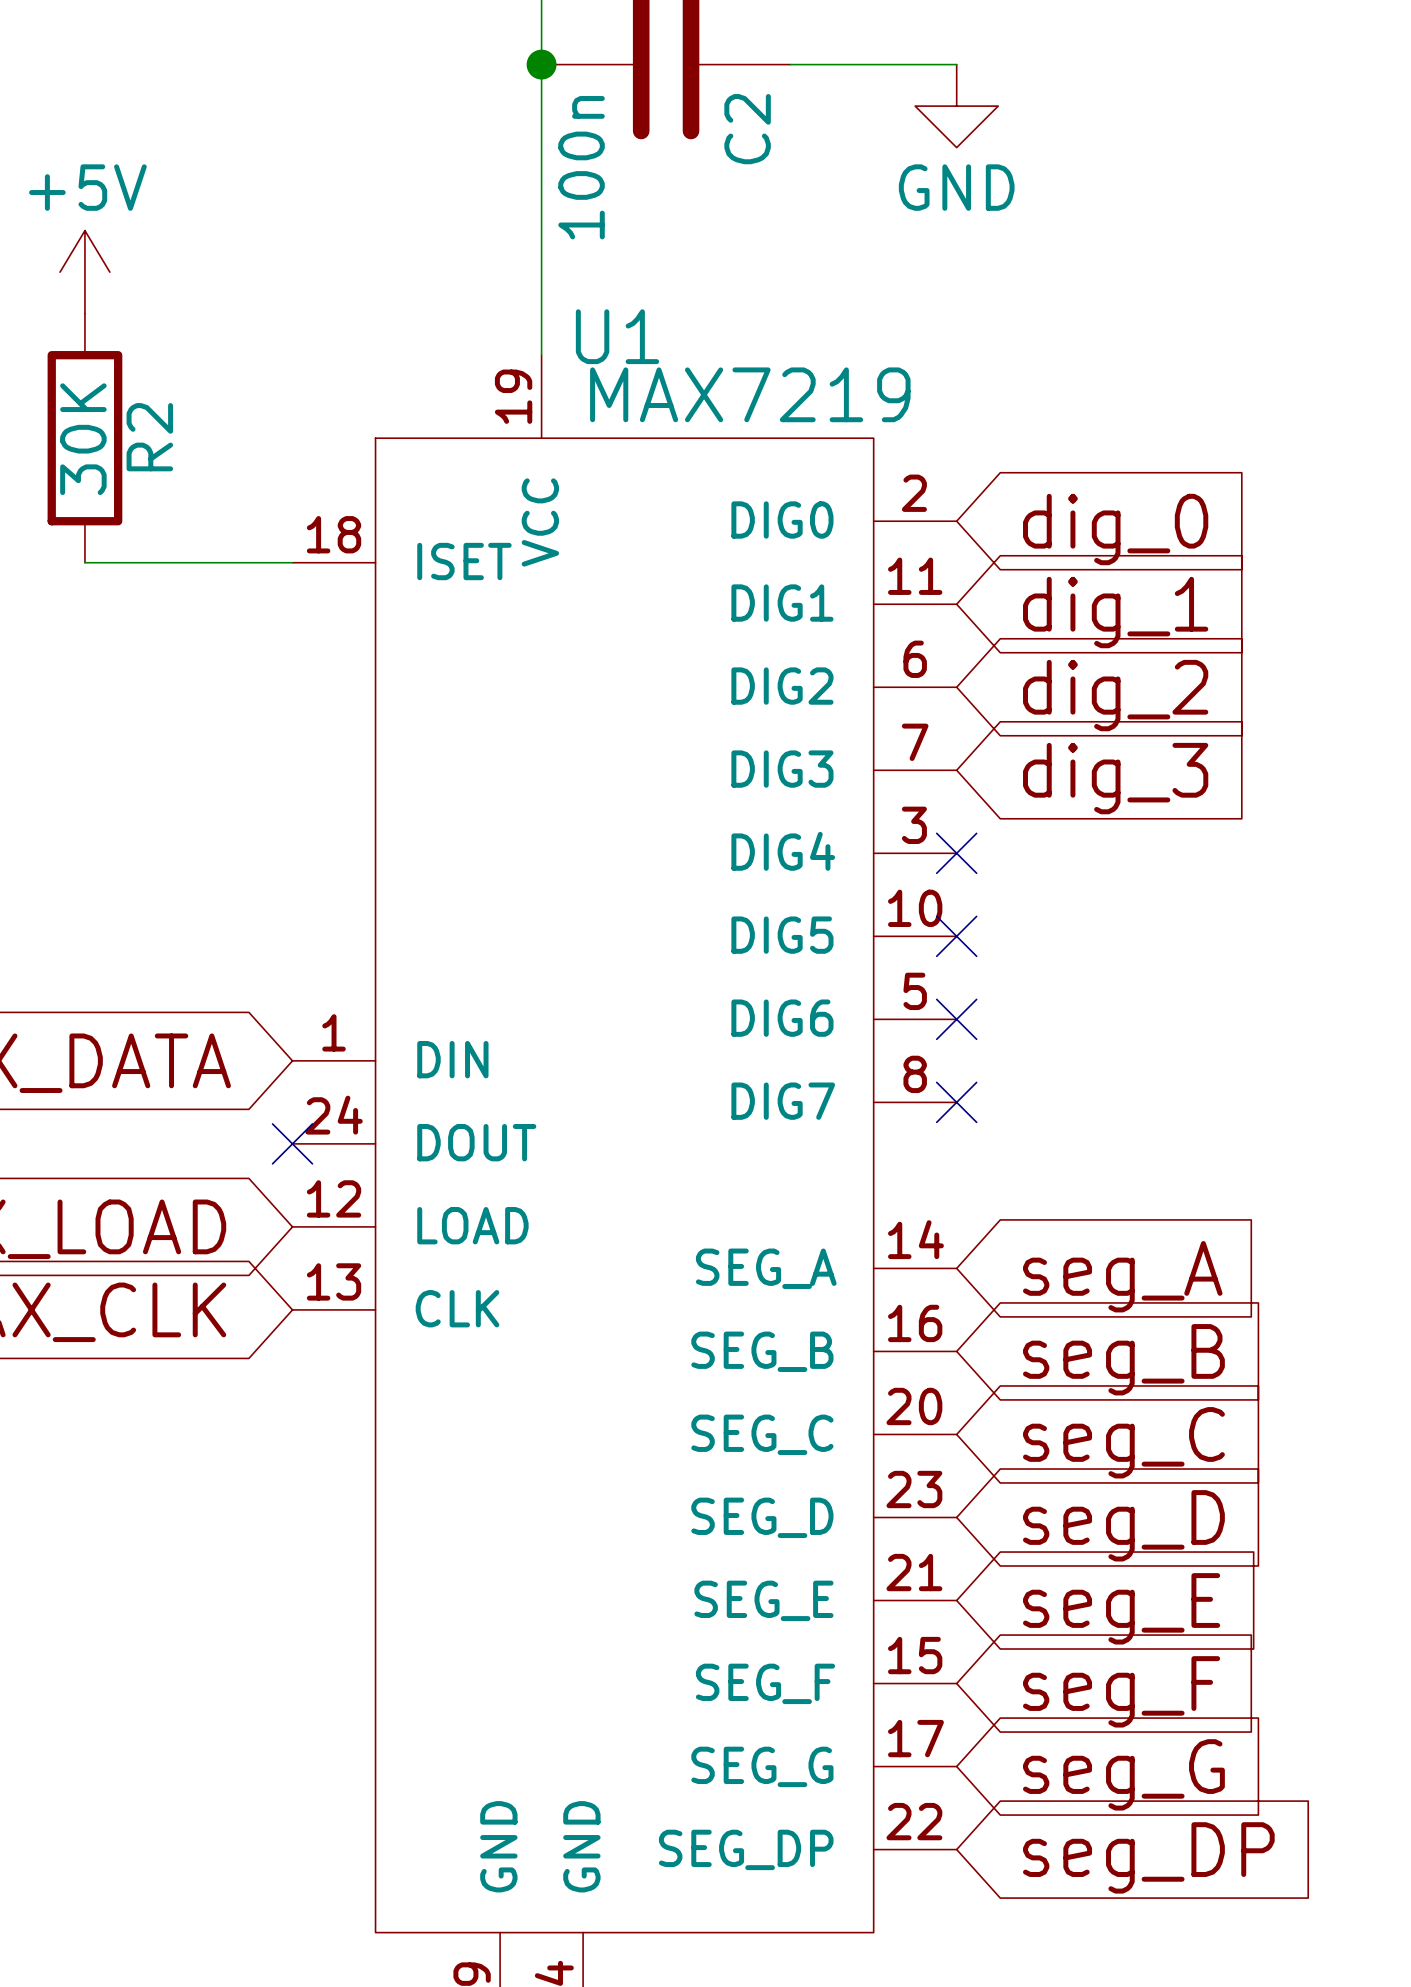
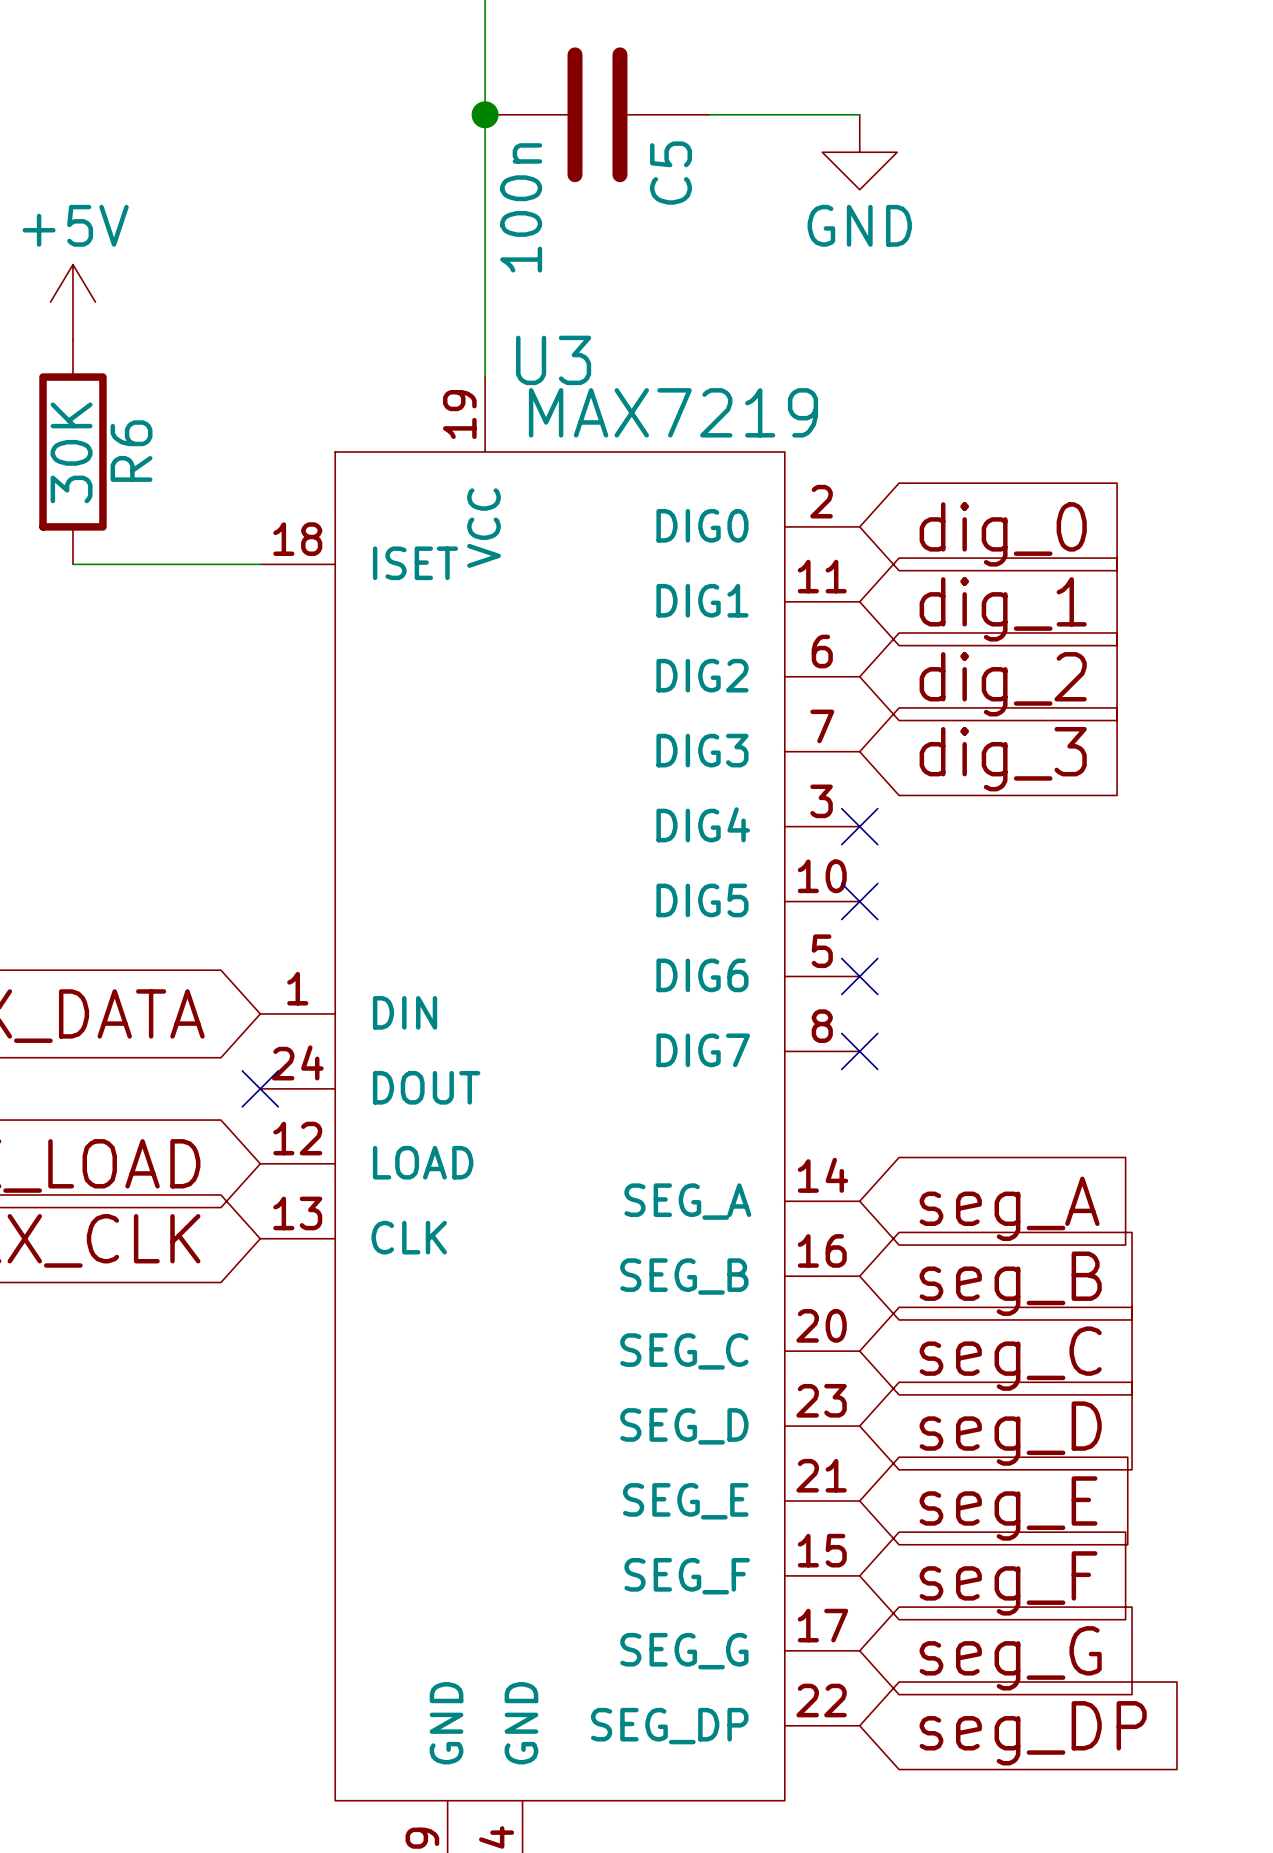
C2 name: C2 (747, 129) -> C5 (671, 173)
U1 name: U1 (617, 336) -> U3 (553, 360)
R2 name: R2 (149, 437) -> R6 (131, 451)

